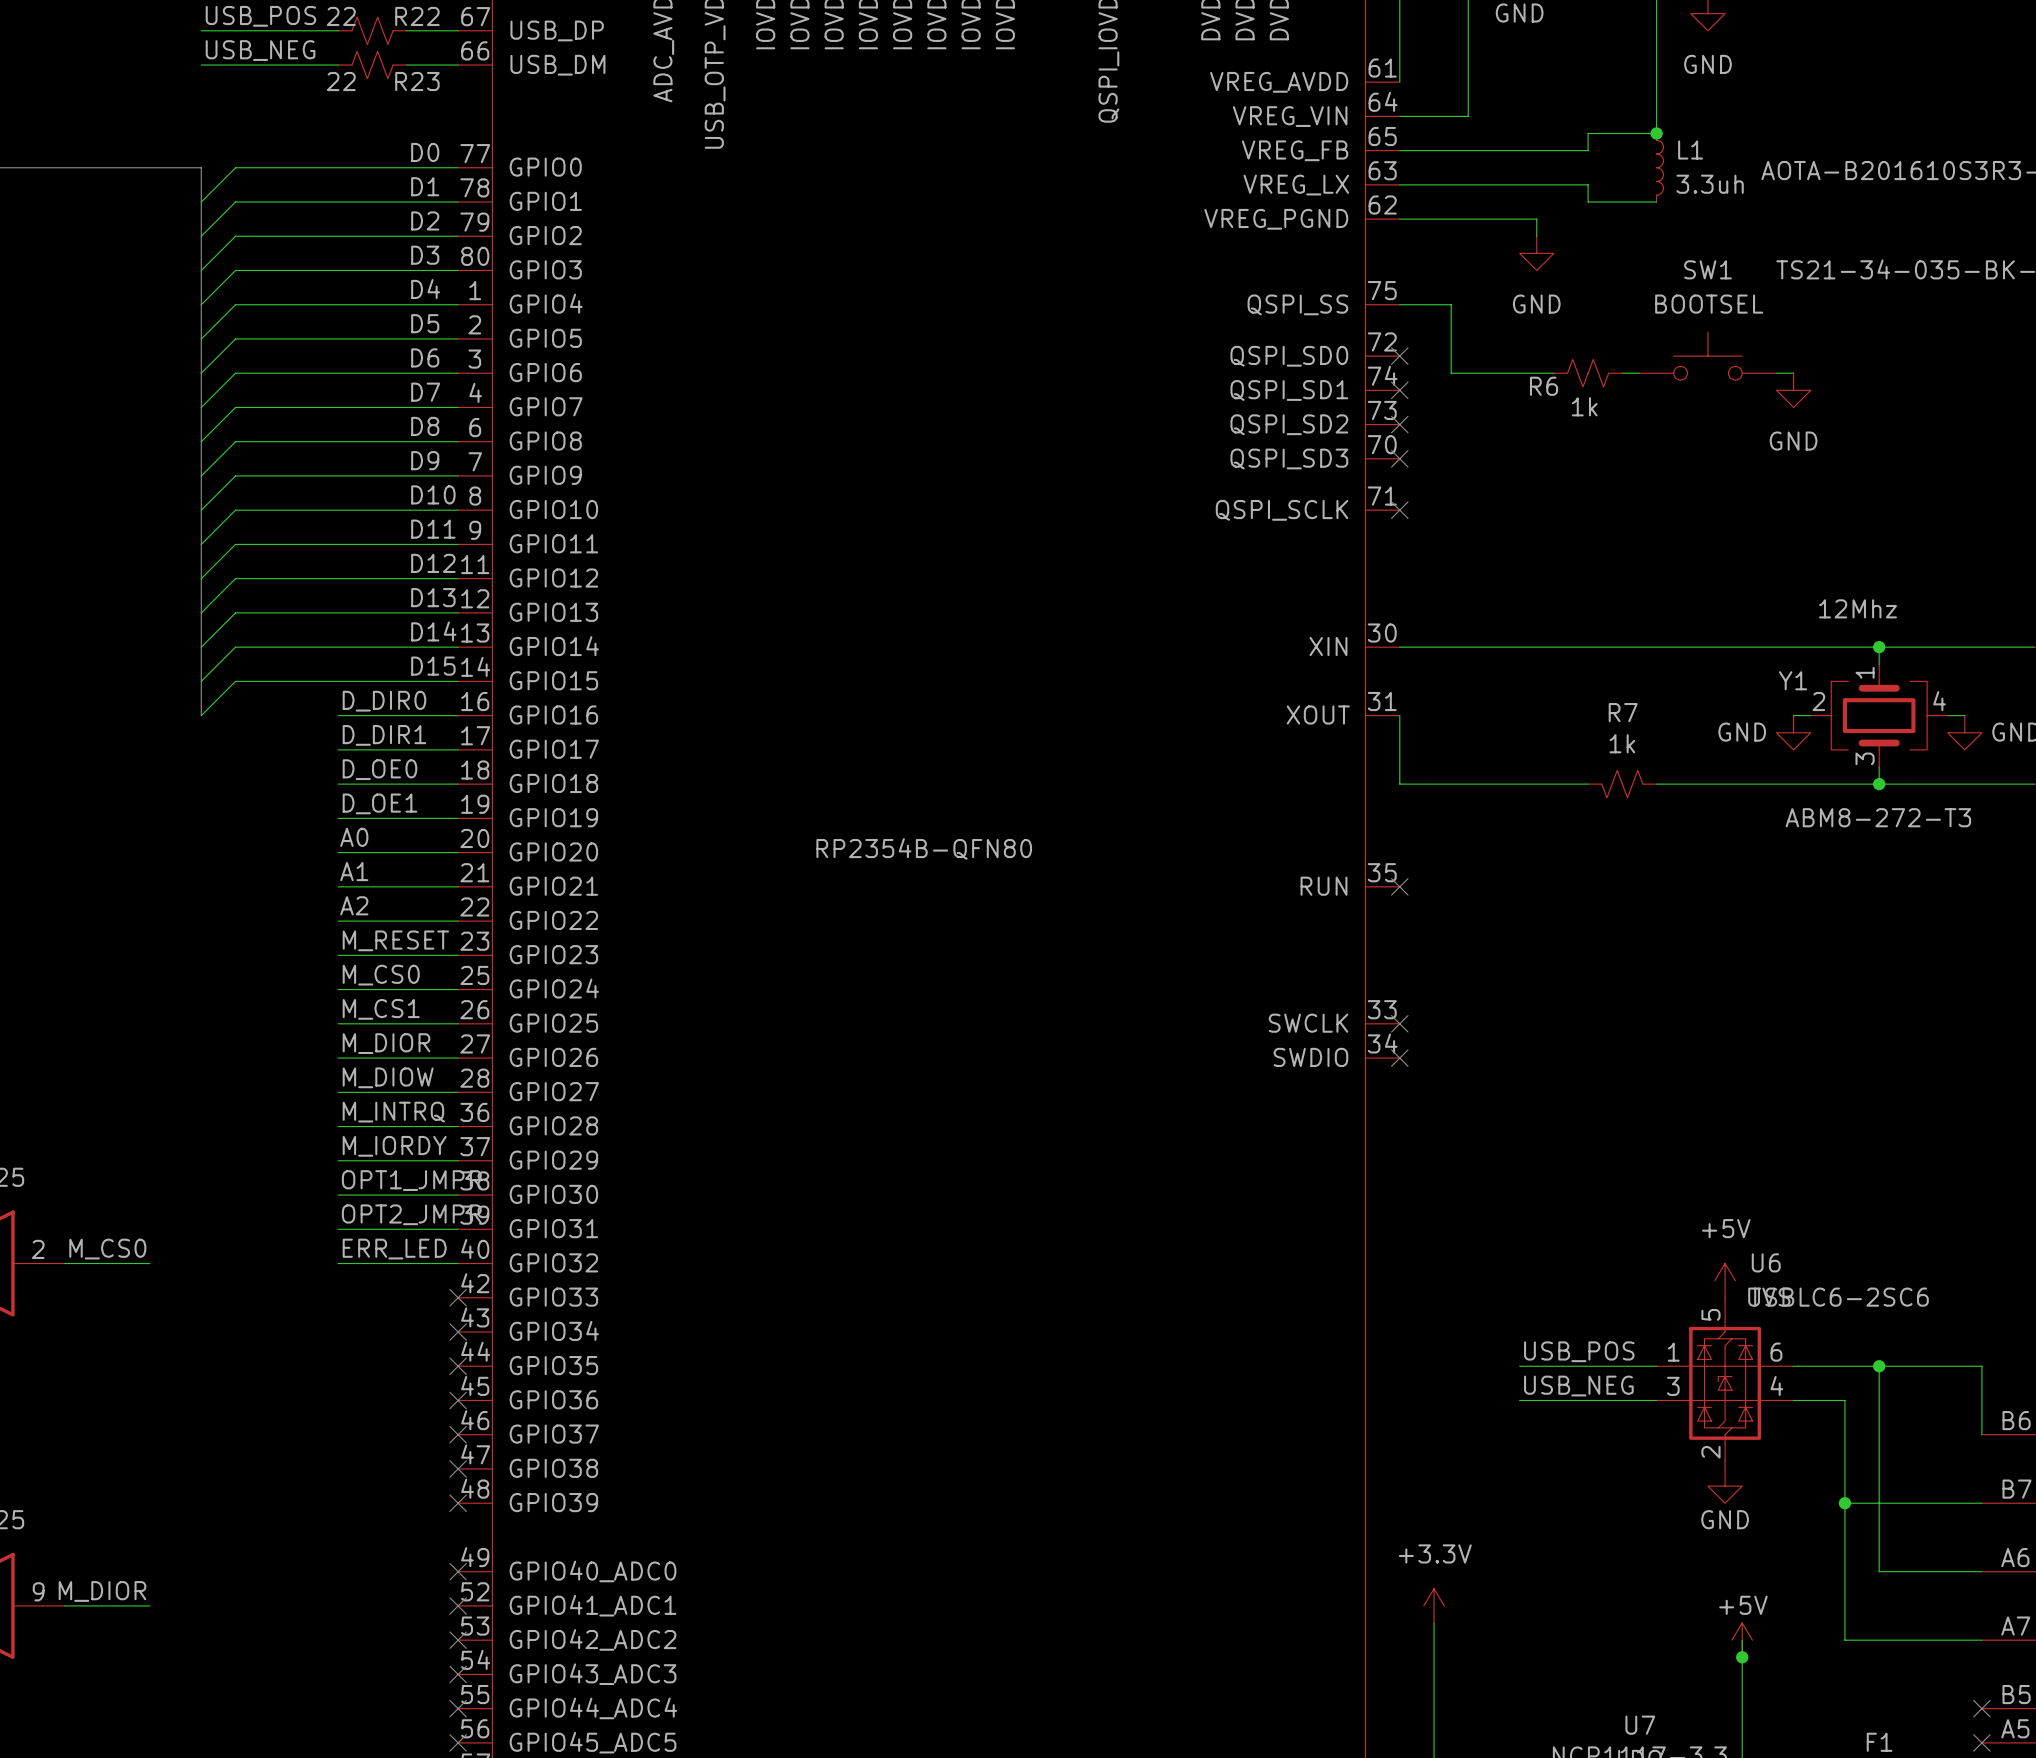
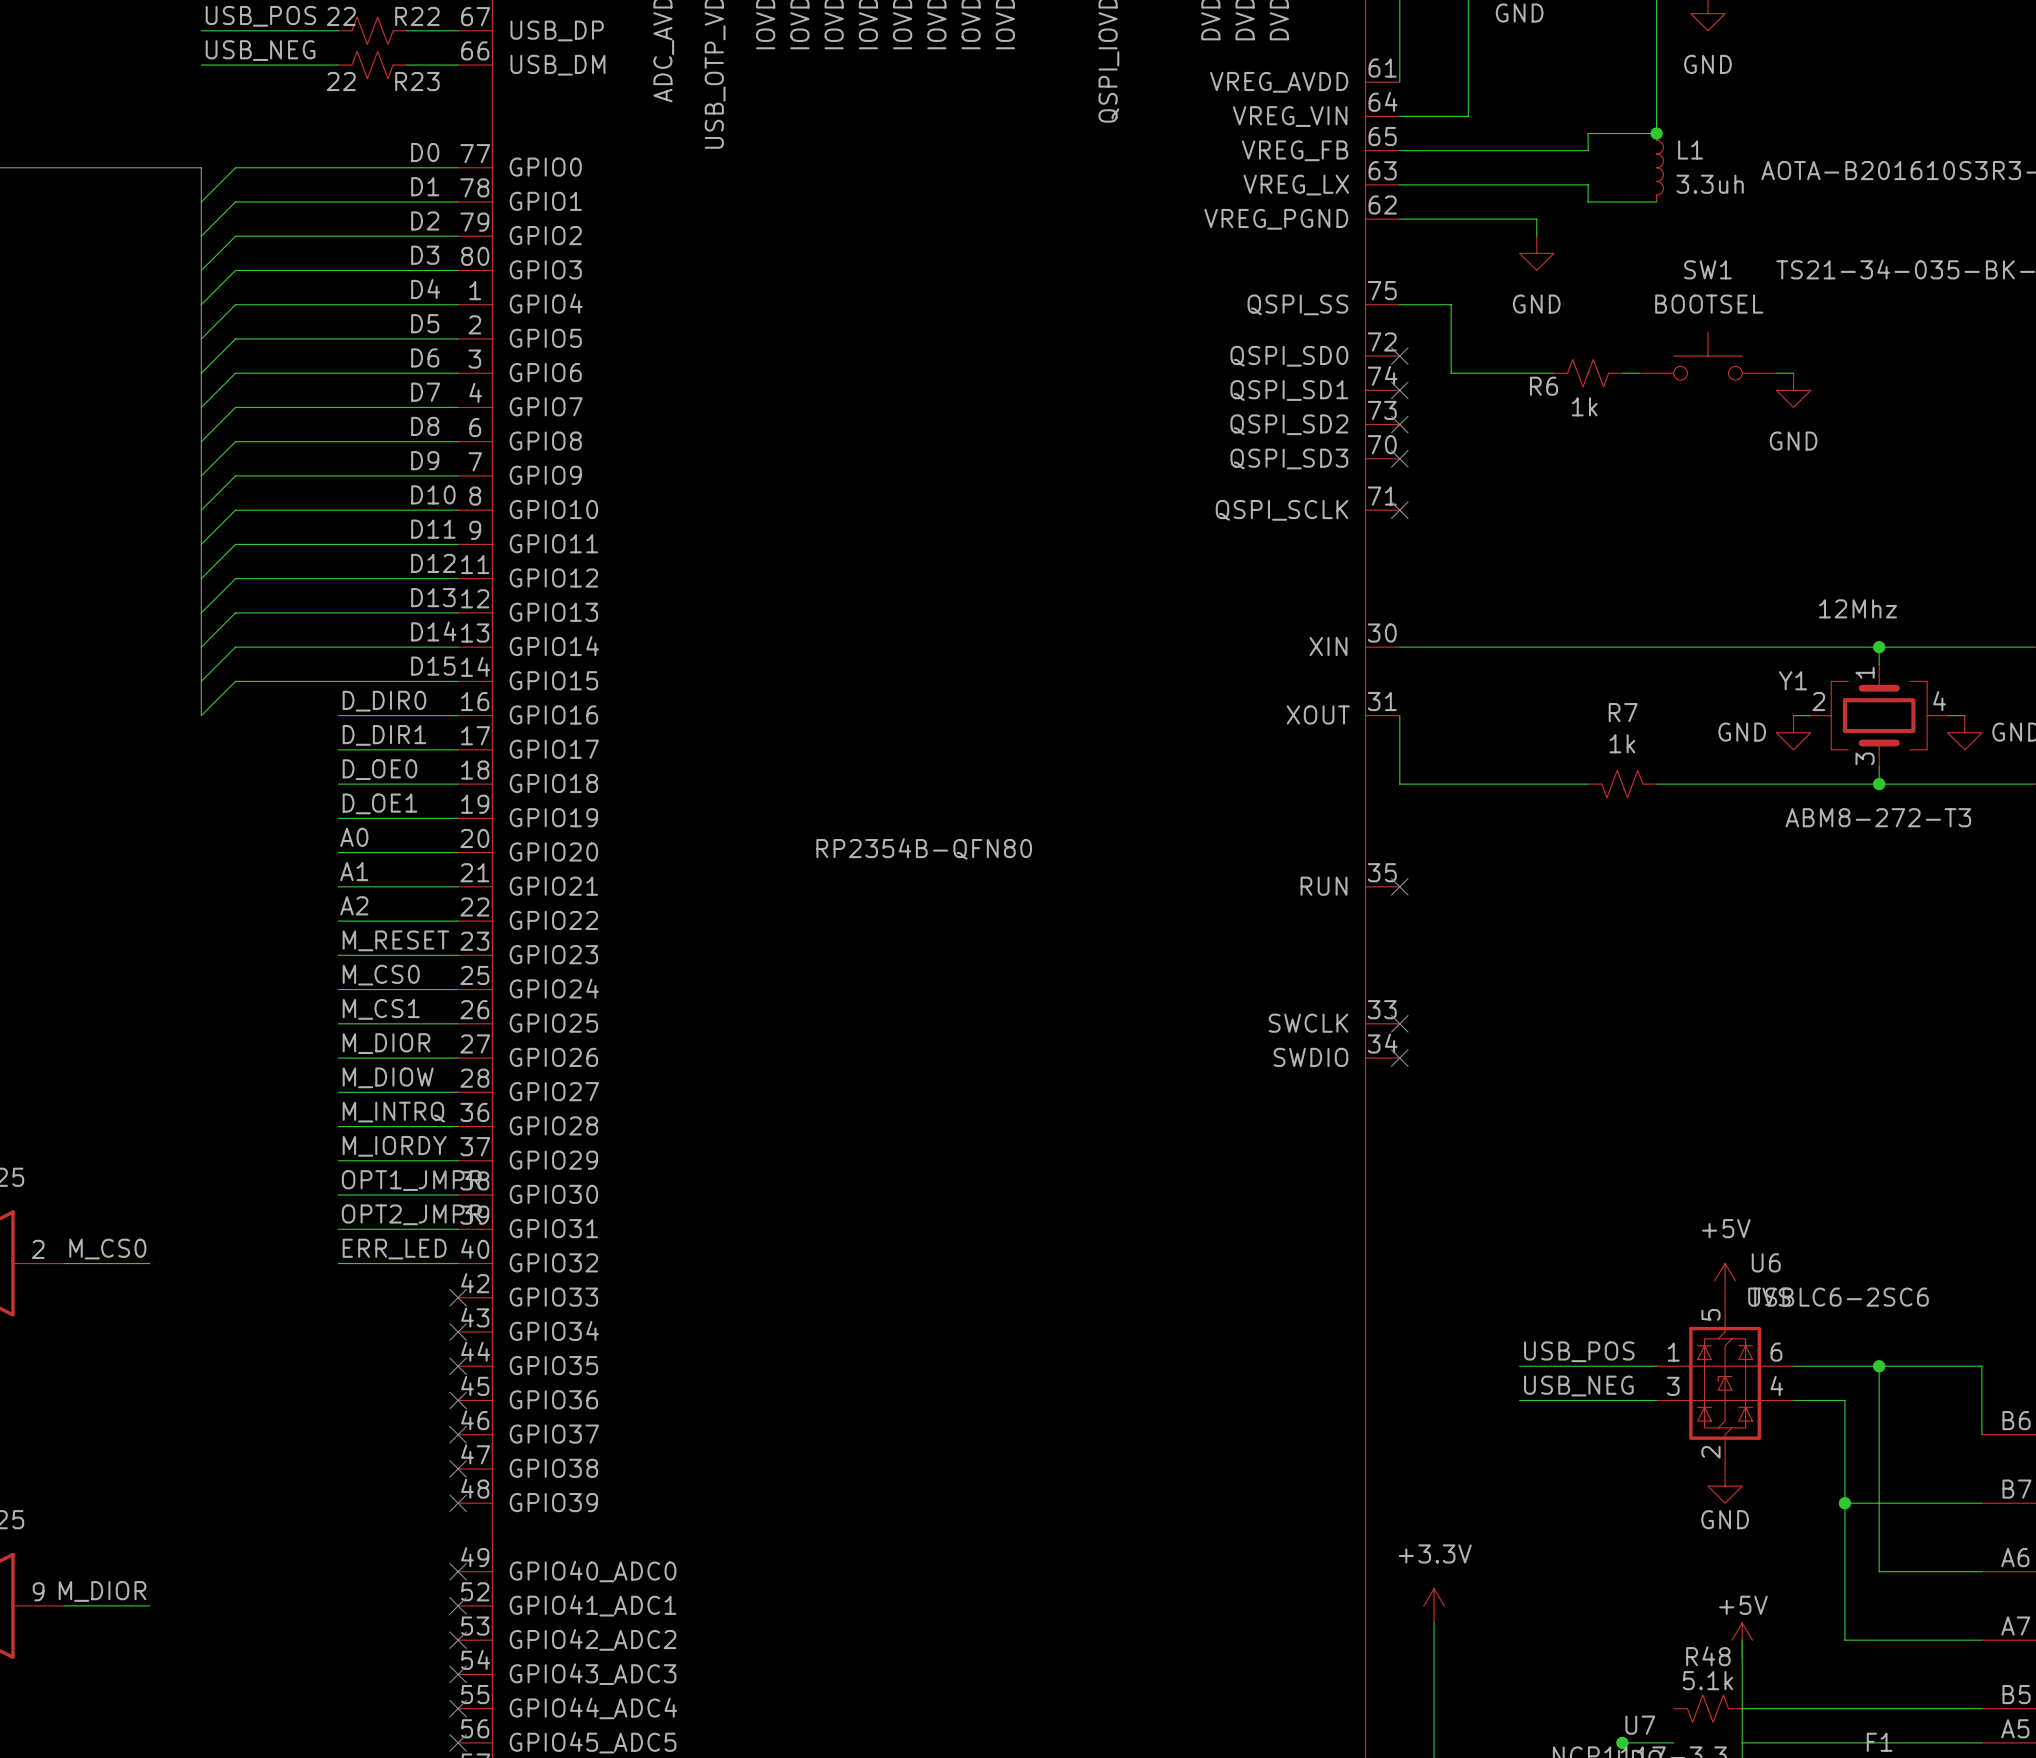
junction: (1742, 1657) -> none
R48: none -> 5.1k (1707, 1708)
wire: none -> (1742, 1708) (1981, 1708)
no-connect mark: (1981, 1708) -> none
wire: none -> (1622, 1742) (1673, 1742)
junction: none -> (1622, 1742)
wire: none -> (1742, 1742) (1981, 1742)
no-connect mark: (1981, 1742) -> none

